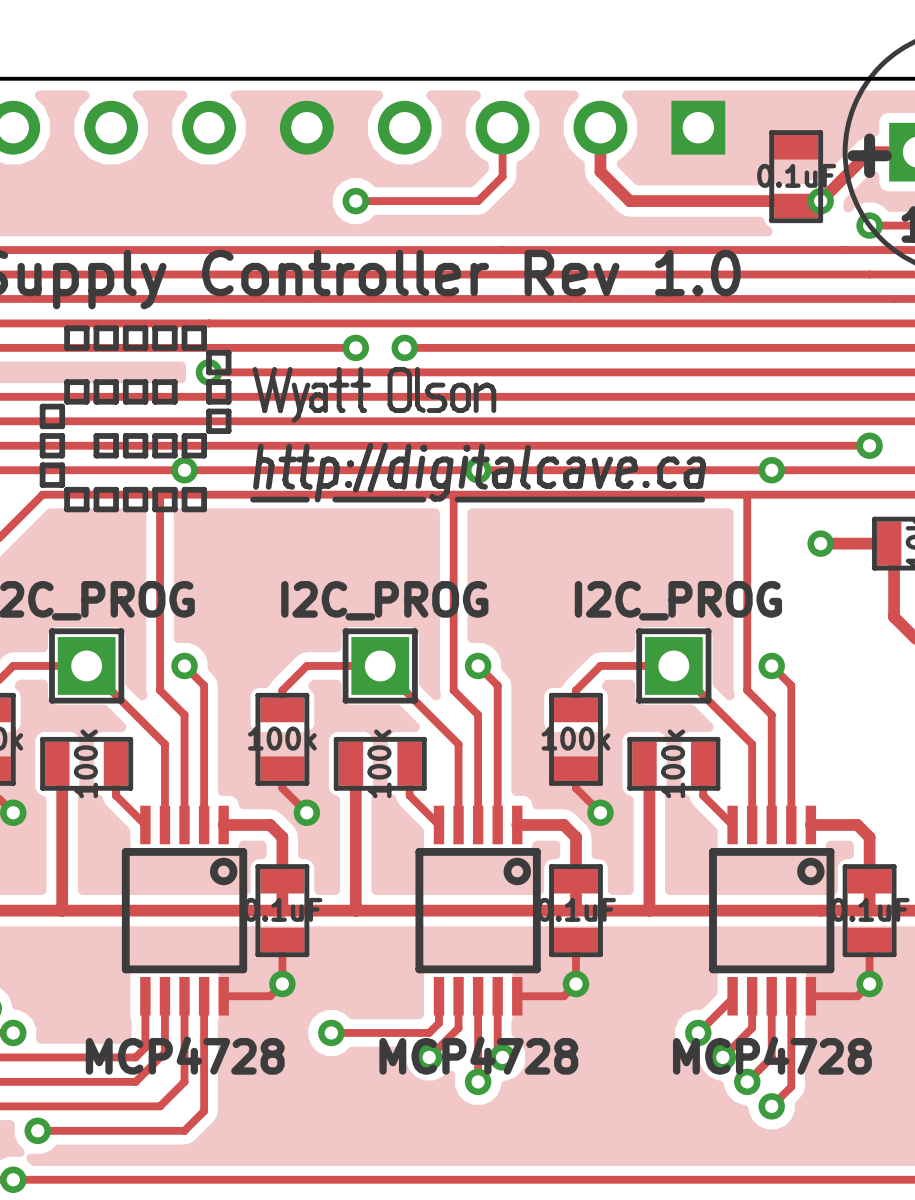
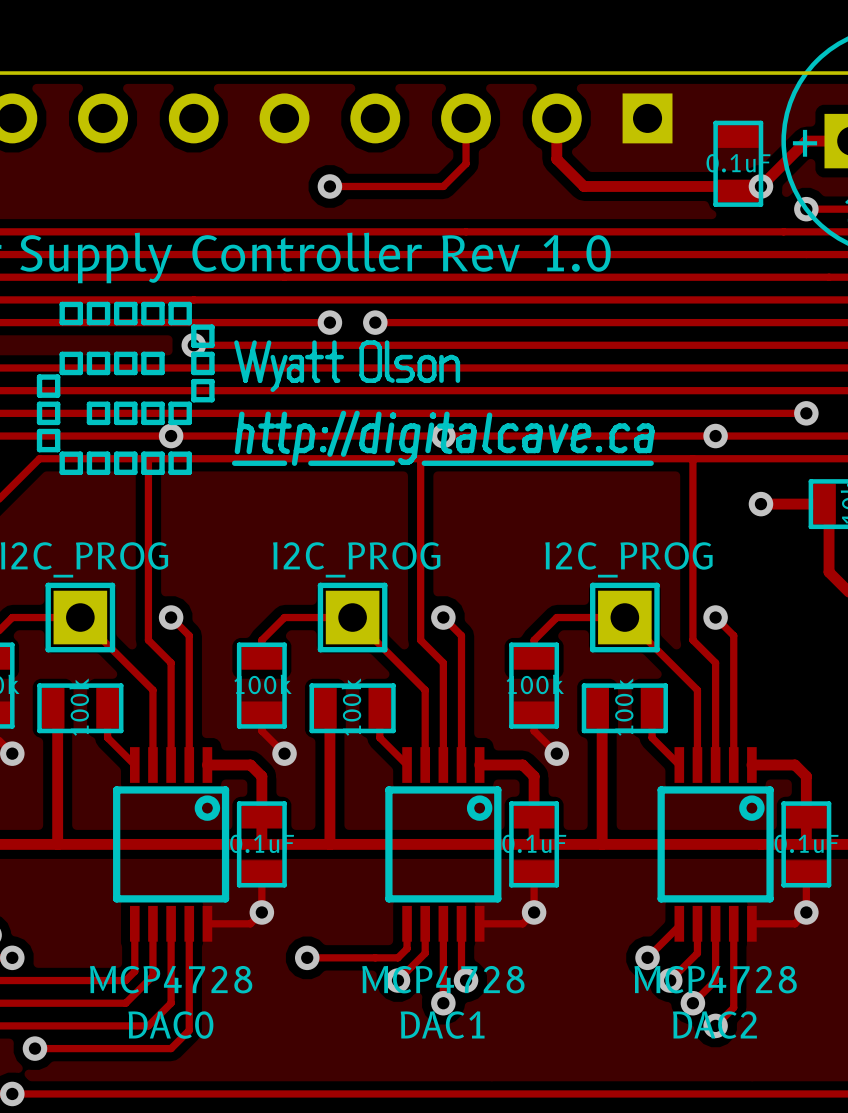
part text: none -> DAC0 (170, 1025)
part text: none -> DAC1 (442, 1025)
part text: none -> DAC2 (714, 1025)

